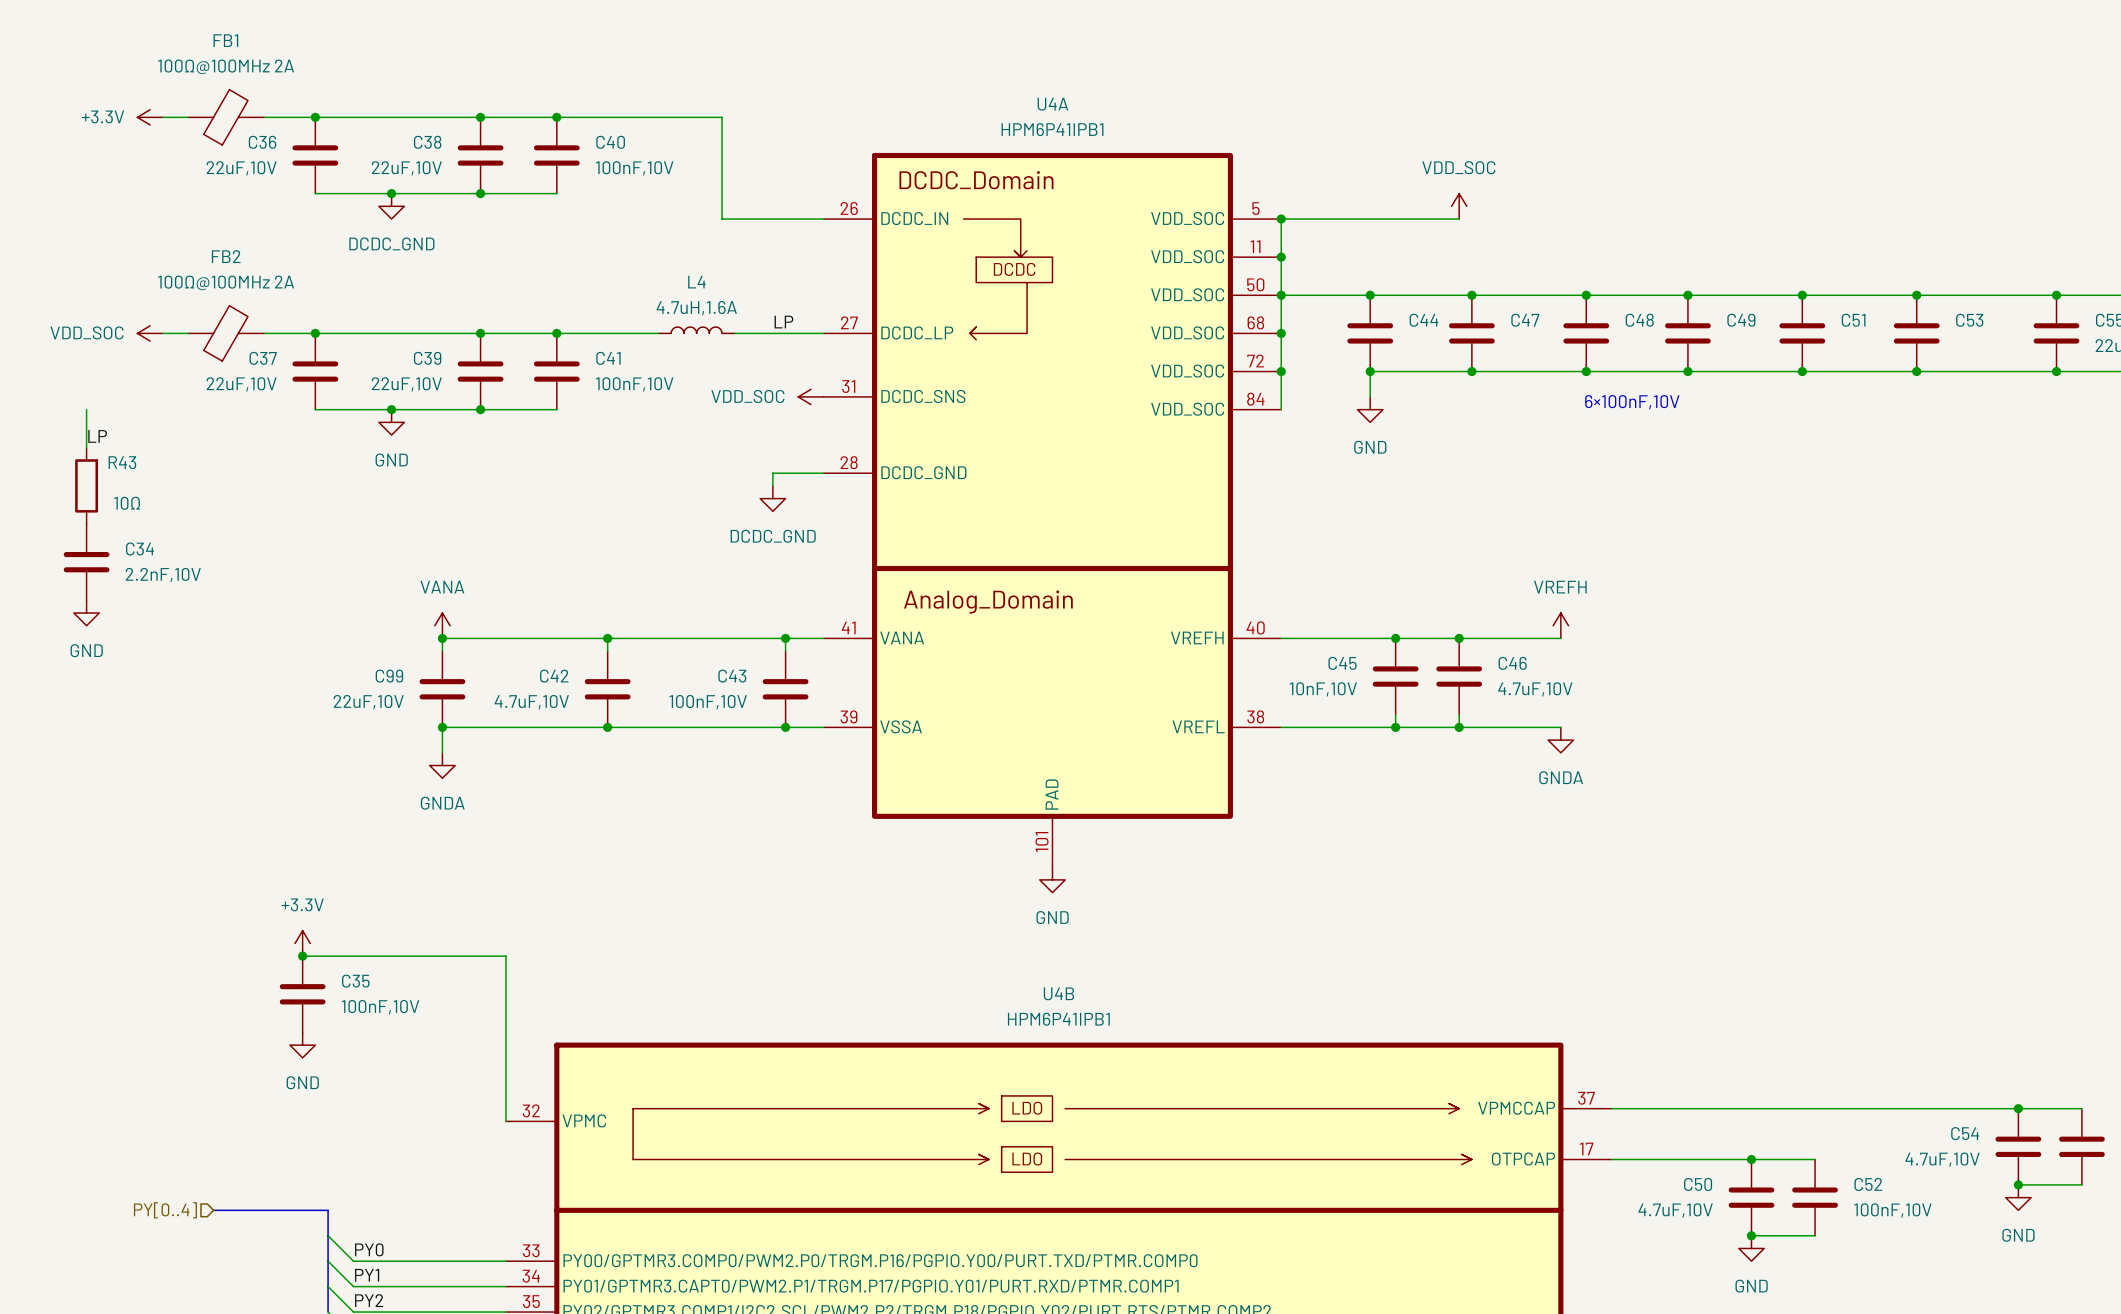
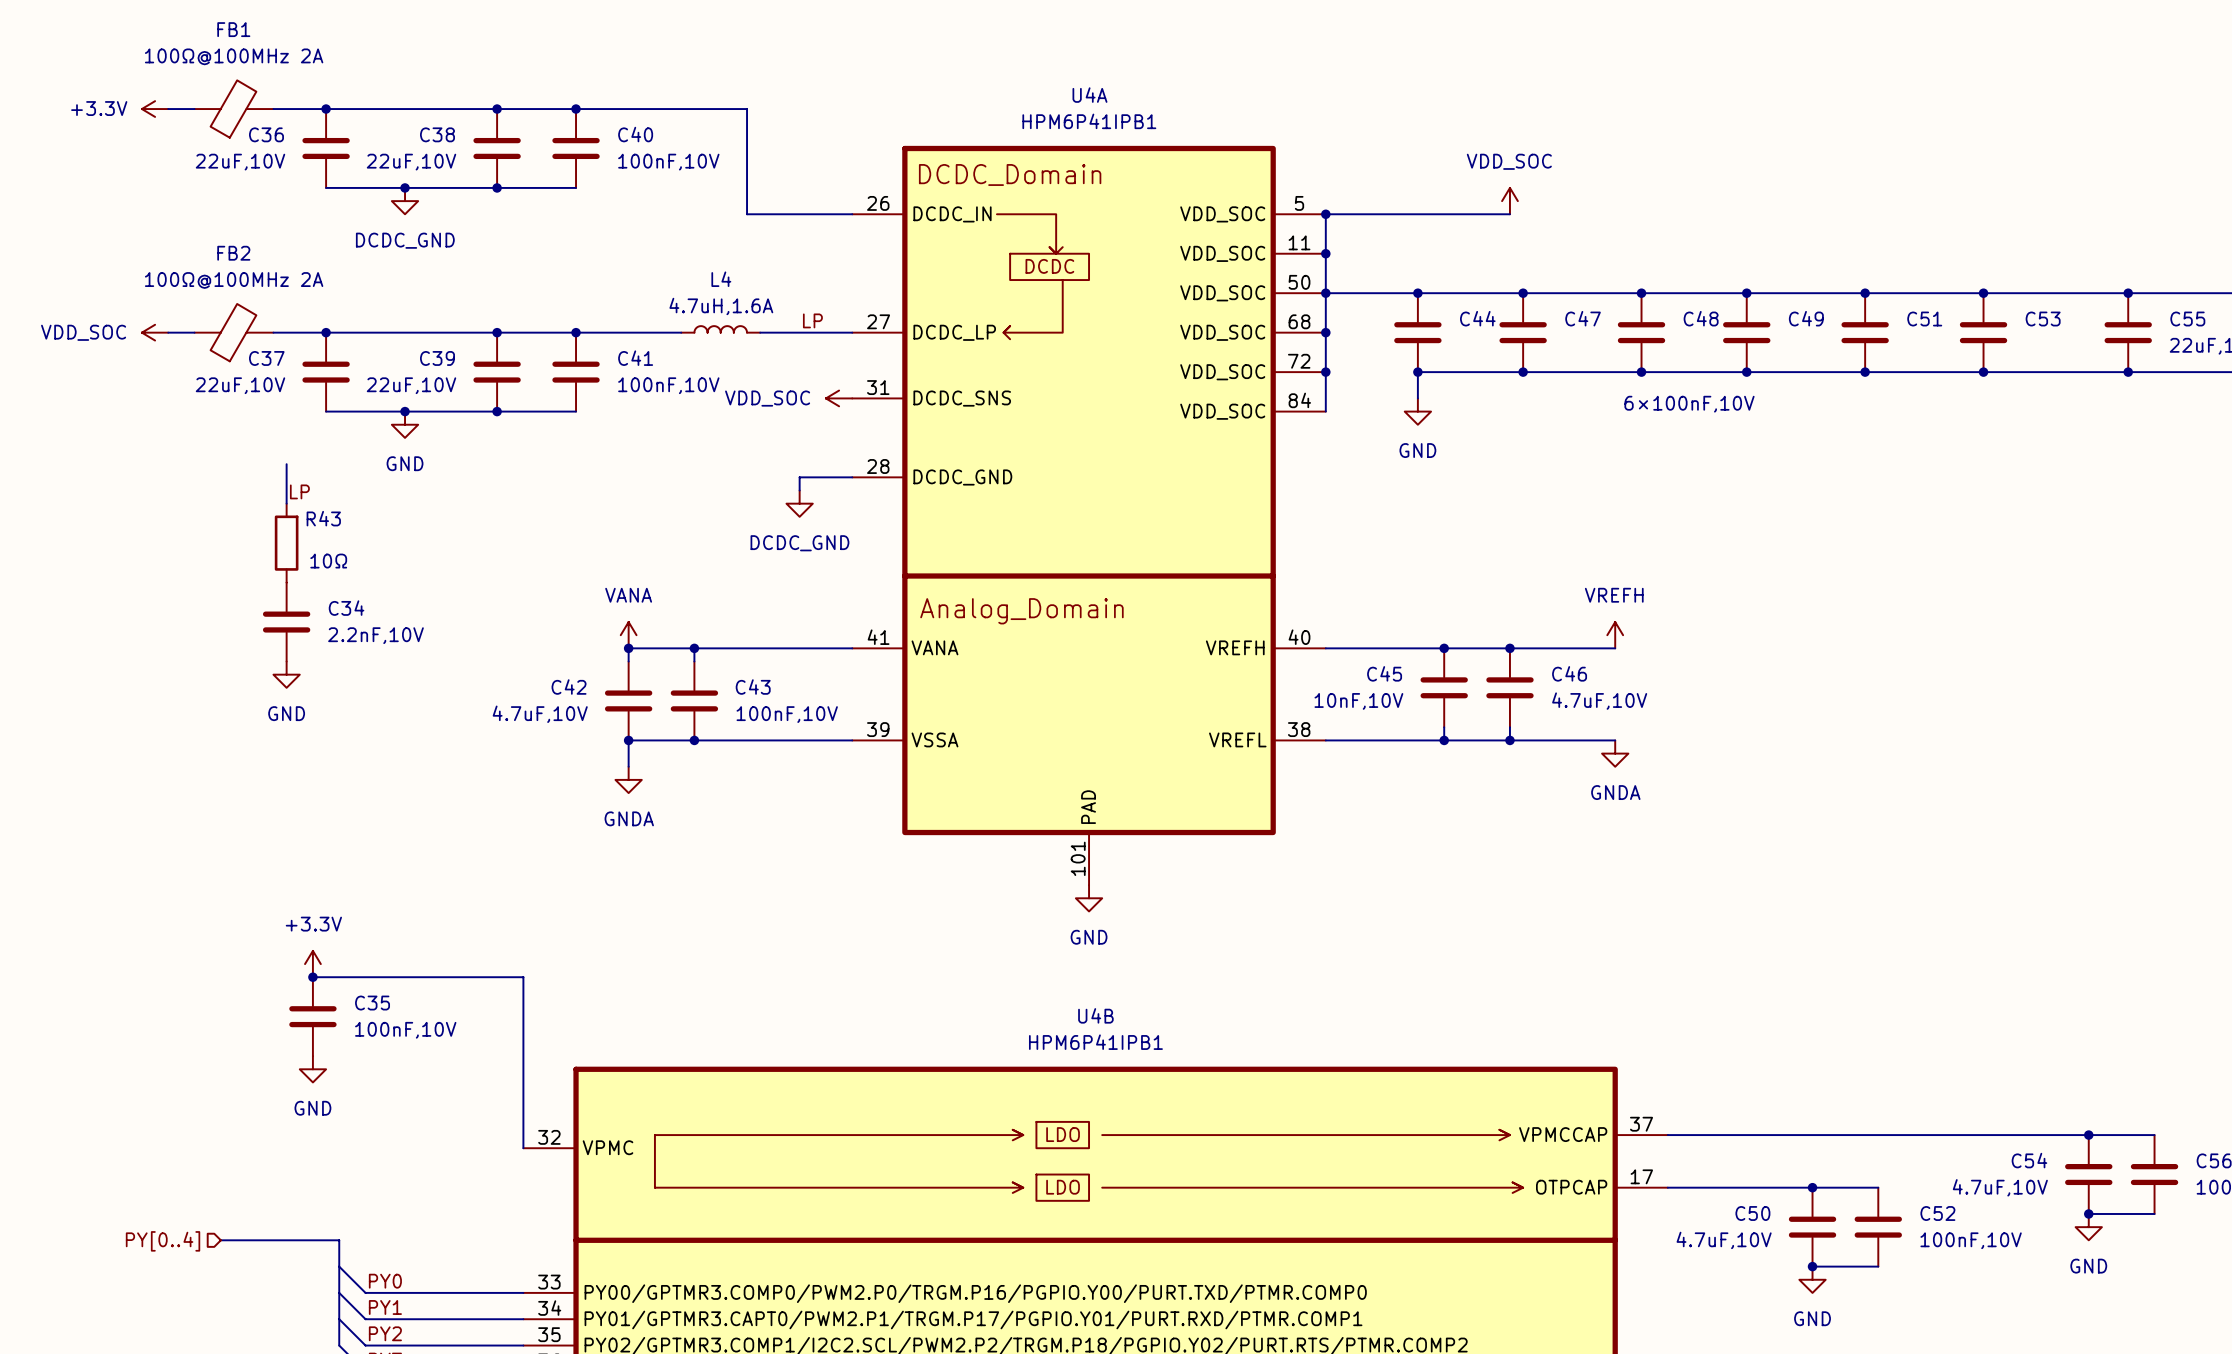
wire: (86, 409) (86, 447) -> (286, 464) (286, 503)
label position: LP (97, 436) -> LP (299, 491)
R43 position: (86, 485) -> (286, 543)
C34 position: (86, 562) -> (286, 622)
power symbol position: GND (86, 613) -> GND (286, 674)
power symbol position: VANA (442, 625) -> VANA (628, 635)
junction: (442, 638) -> none
wire: (607, 638) (442, 638) (442, 651) -> none
junction: none -> (694, 648)
wire: (785, 638) (785, 651) -> (694, 648) (694, 661)
junction: (785, 638) -> none
C99: 22uF,10V (442, 689) -> none
C43 position: (785, 689) -> (694, 700)
C43 value position: 100nF,10V (708, 702) -> 100nF,10V (787, 714)
junction: (442, 727) -> none
wire: (607, 727) (442, 727) (442, 752) -> (628, 740) (628, 766)
junction: none -> (694, 740)
junction: (785, 727) -> none
power symbol position: GNDA (442, 765) -> GNDA (628, 779)

